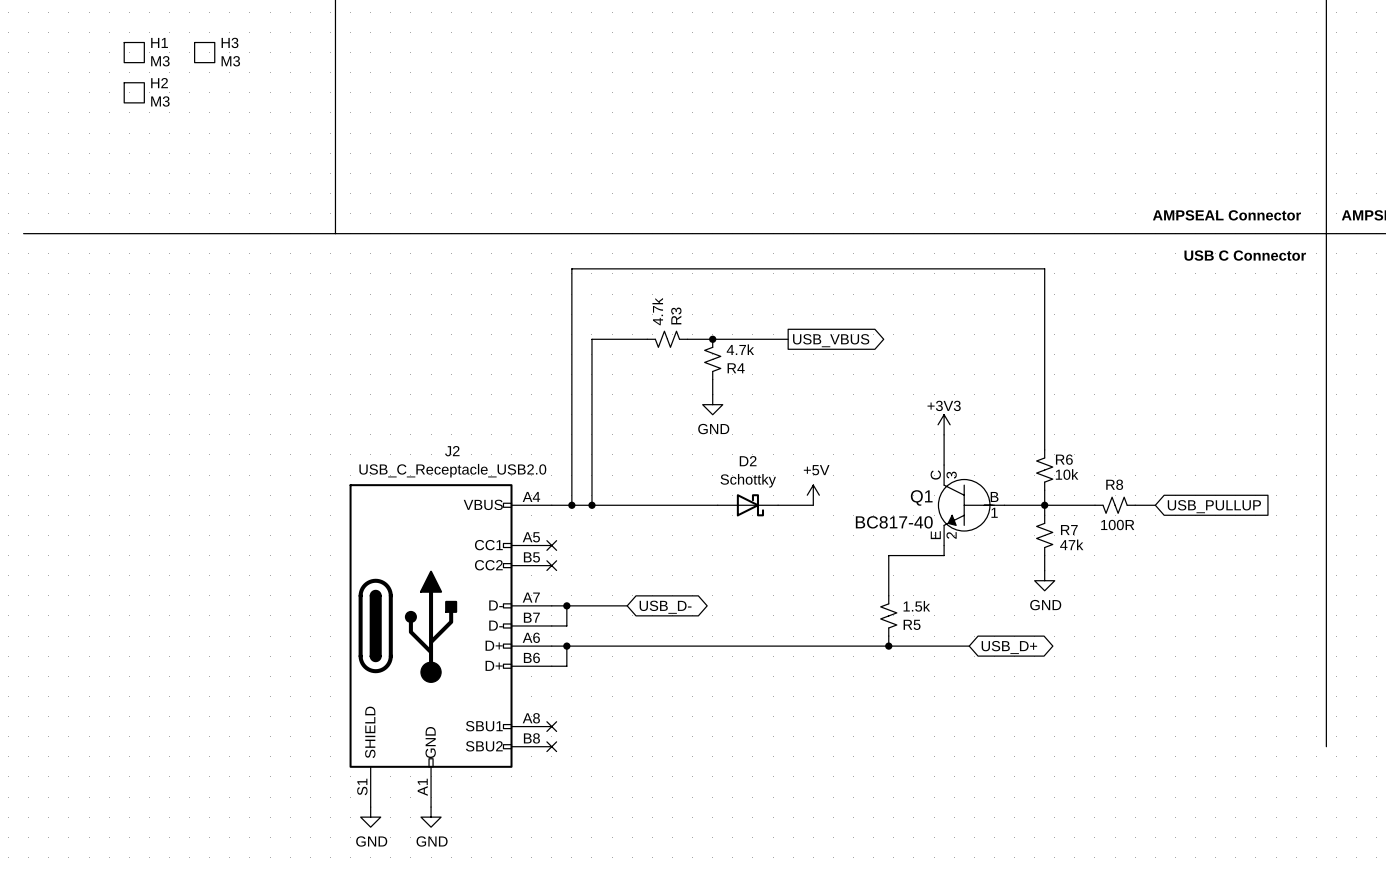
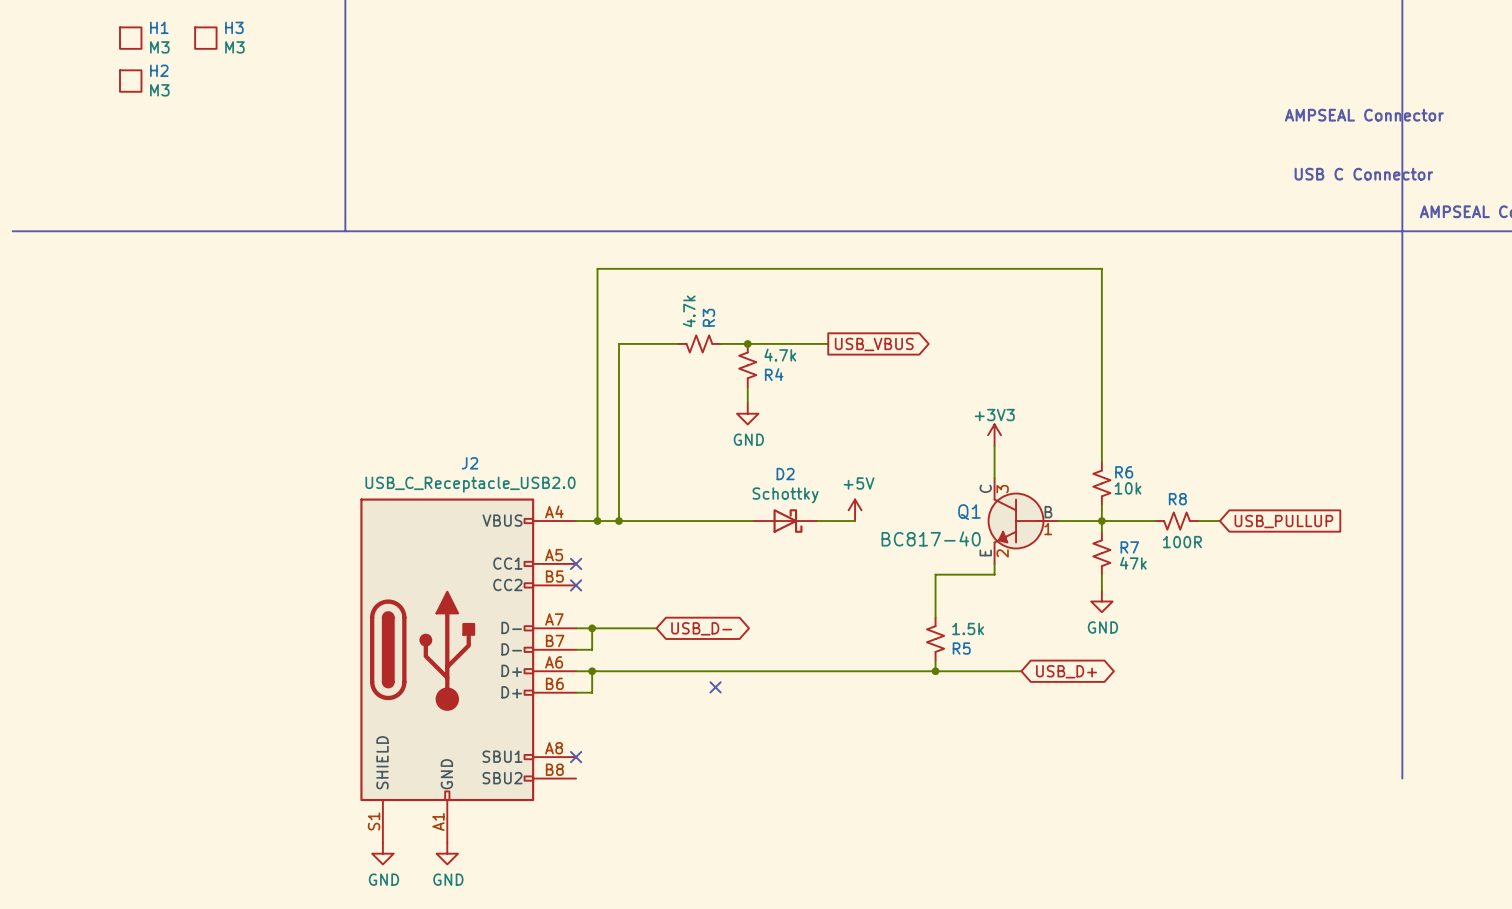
text position: AMPSEAL Connector (1226, 215) -> AMPSEAL Connector (1364, 115)
text position: USB C Connector (1245, 255) -> USB C Connector (1363, 174)
no-connect mark: none -> (715, 687)
no-connect mark: (551, 746) -> none

